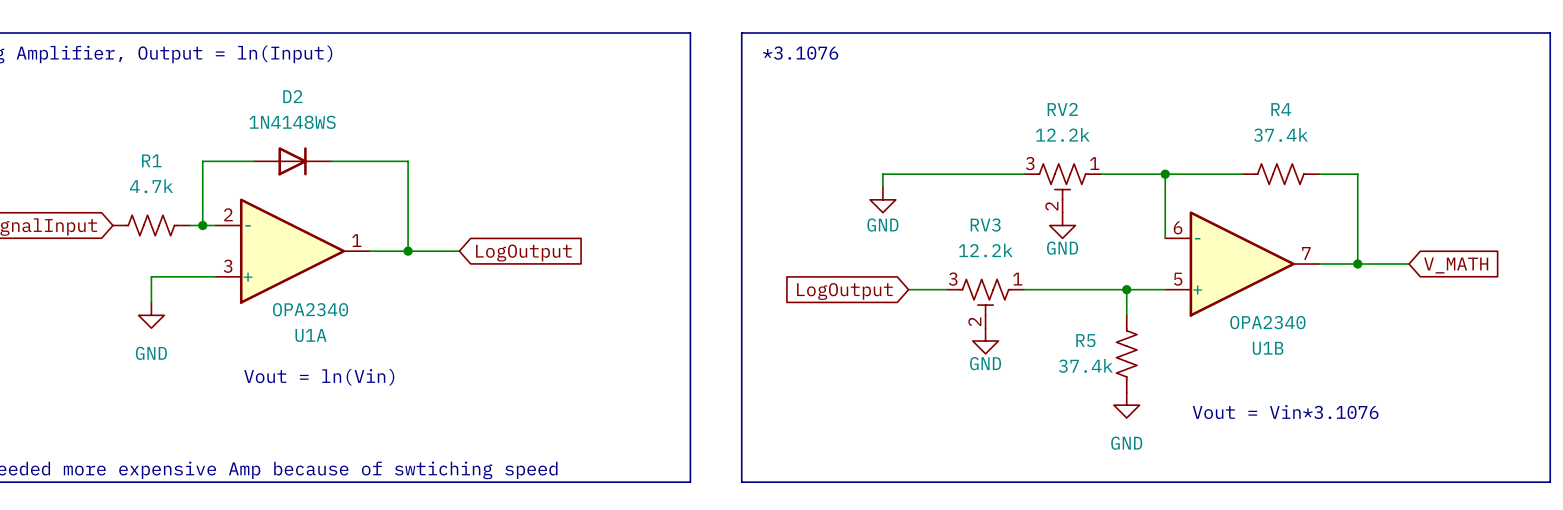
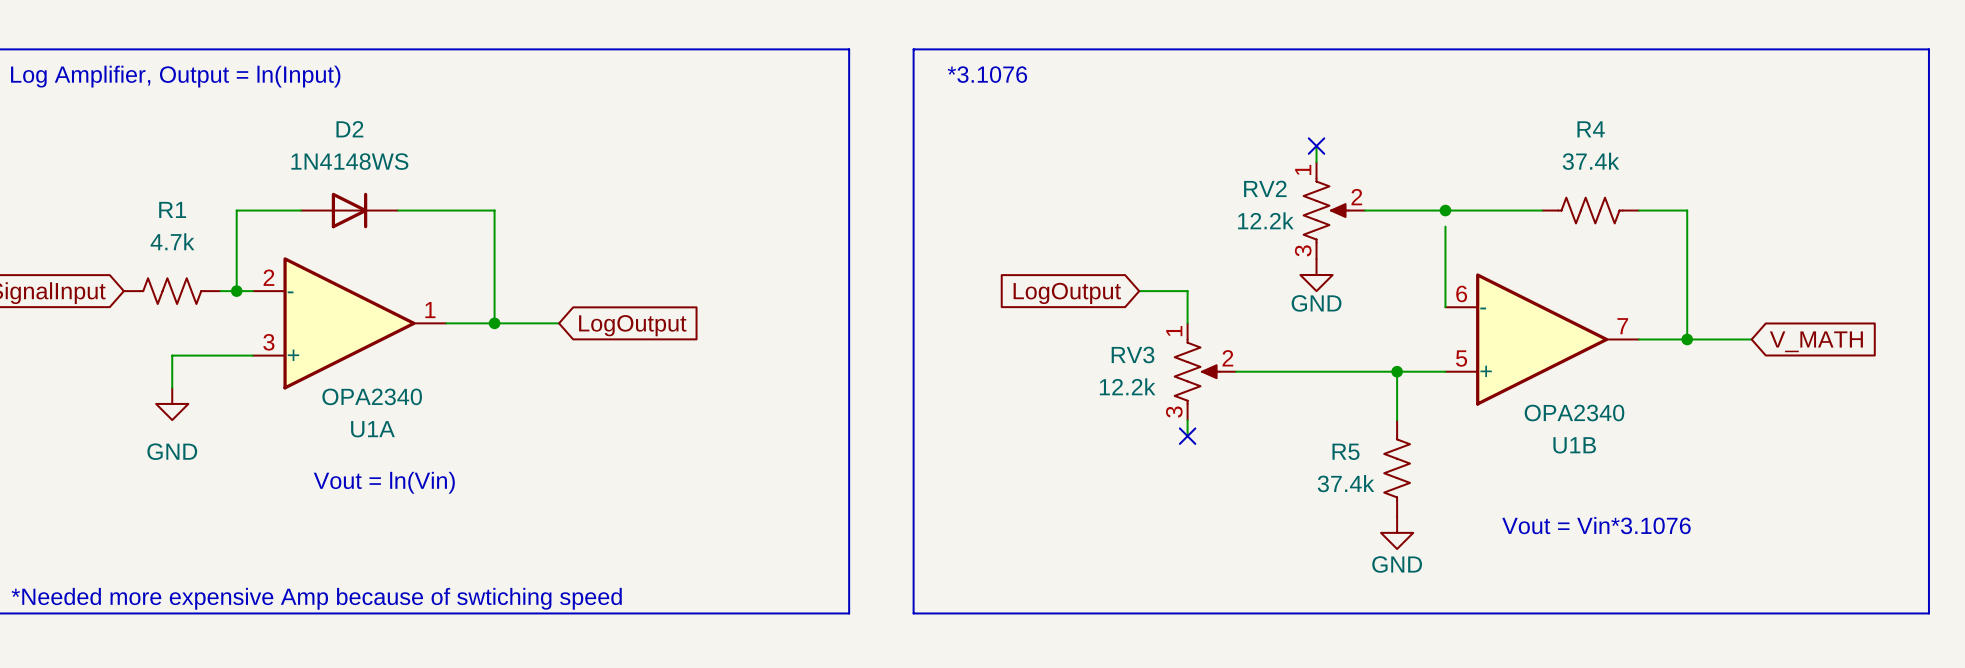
RV2 name position: RV2 (1062, 109) -> RV2 (1265, 188)
wire: none -> (1316, 146) (1316, 162)
no-connect mark: none -> (1316, 146)
RV2 value position: 12.2k (1062, 134) -> 12.2k (1265, 220)
RV2 symbol: [1024, 163, 1102, 213] -> [1303, 162, 1365, 259]
wire: (1024, 174) (882, 174) (882, 187) -> none
wire: (1101, 174) (1242, 174) -> (1364, 210) (1542, 210)
junction position: (1165, 174) -> (1445, 210)
R4 position: (1280, 174) -> (1590, 210)
wire: (1319, 174) (1357, 174) -> (1638, 210) (1687, 210) (1687, 226)
power symbol: GND (882, 199) -> none
wire: none -> (1139, 291) (1187, 291) (1187, 323)
RV3 name position: RV3 (985, 225) -> RV3 (1133, 354)
power symbol position: GND (1062, 225) -> GND (1316, 275)
RV3 value position: 12.2k (985, 250) -> 12.2k (1127, 386)
RV3 symbol: [947, 279, 1025, 329] -> [1174, 323, 1236, 421]
wire: (908, 289) (947, 289) -> none
global label position: LogOutput (844, 291) -> LogOutput (1067, 293)
wire: none -> (1187, 420) (1187, 436)
no-connect mark: none -> (1187, 436)
power symbol: GND (985, 341) -> none
R5 position: (1126, 353) -> (1397, 468)
power symbol position: GND (1126, 405) -> GND (1397, 532)

